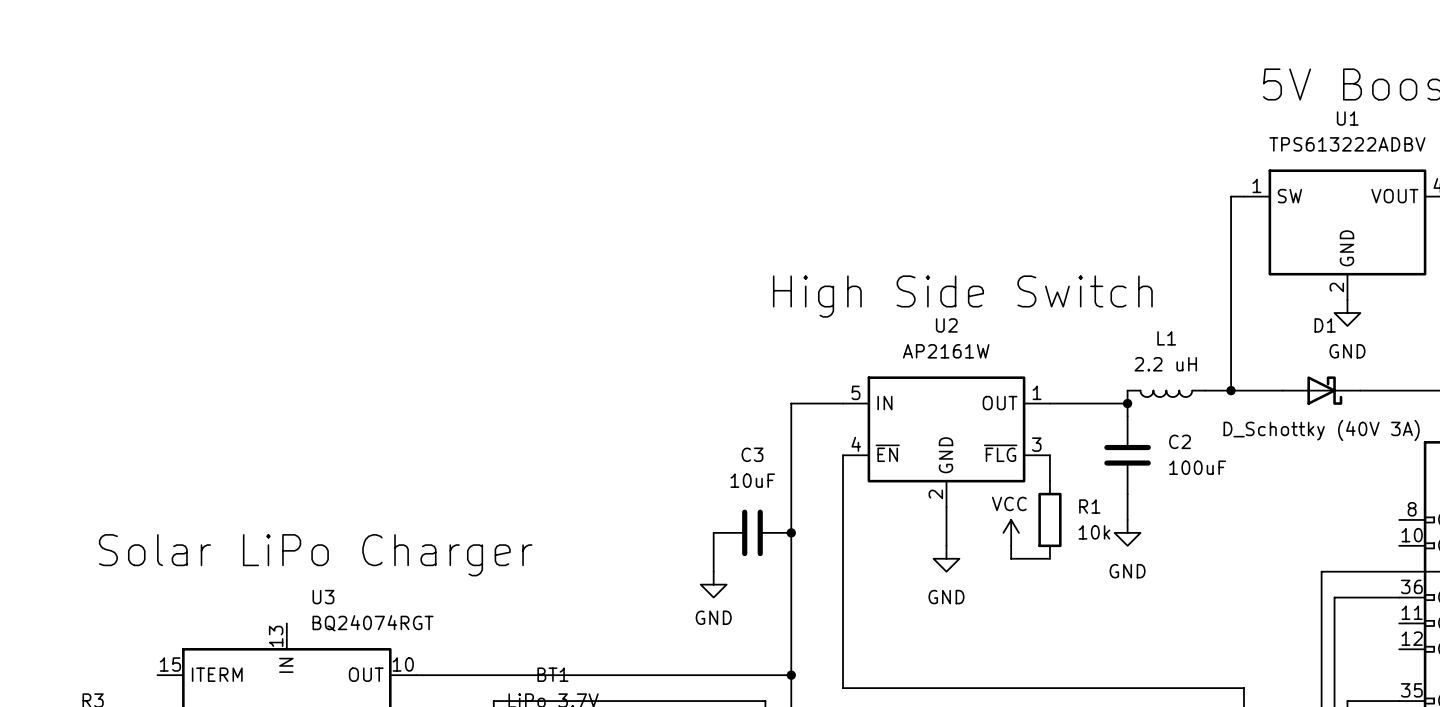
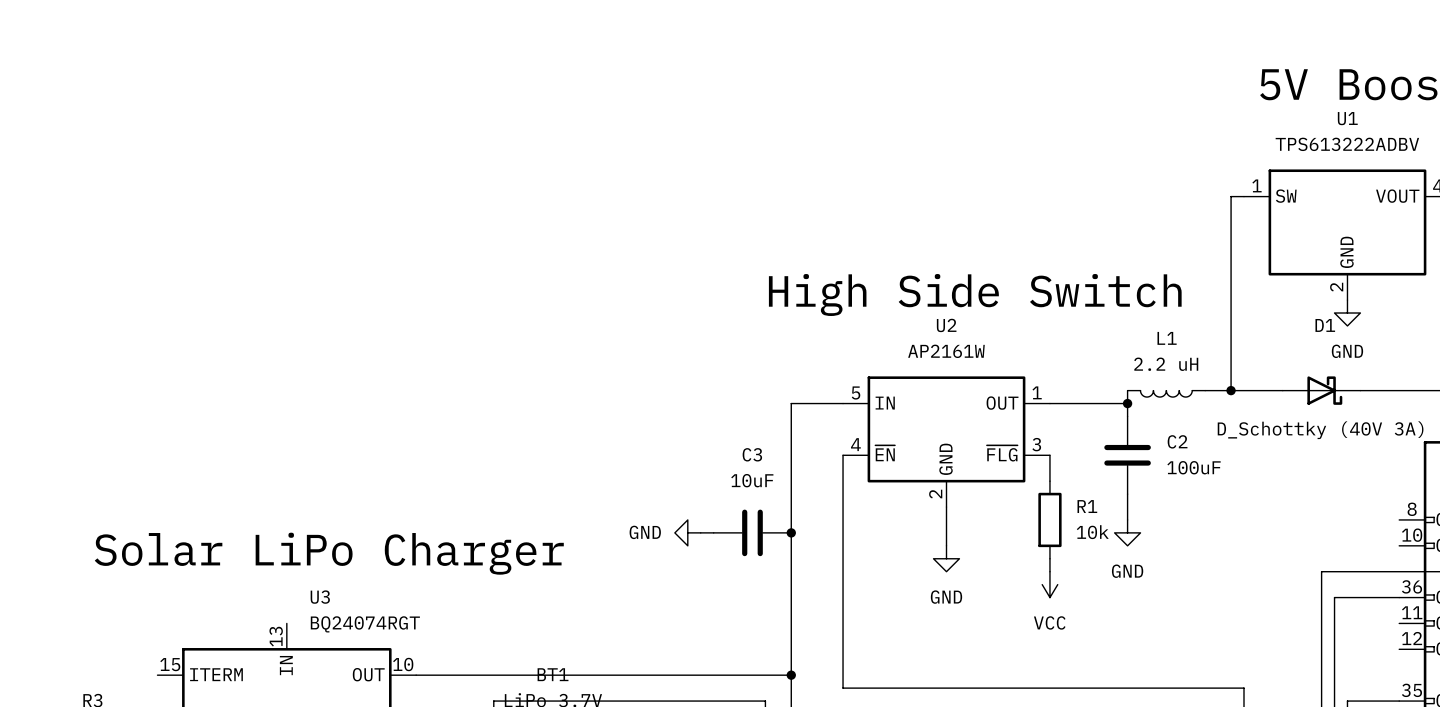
wire: (713, 532) (713, 571) -> (713, 532) (700, 532)
power symbol rotation: 0° (1011, 532) -> 180° (1049, 584)
power symbol position: VCC (1011, 532) -> VCC (1049, 584)
wire: (1011, 545) (1011, 558) (1049, 558) -> (1049, 571) (1049, 558)
power symbol rotation: 0° (713, 584) -> 90° clockwise (687, 532)
power symbol position: GND (713, 584) -> GND (687, 532)

